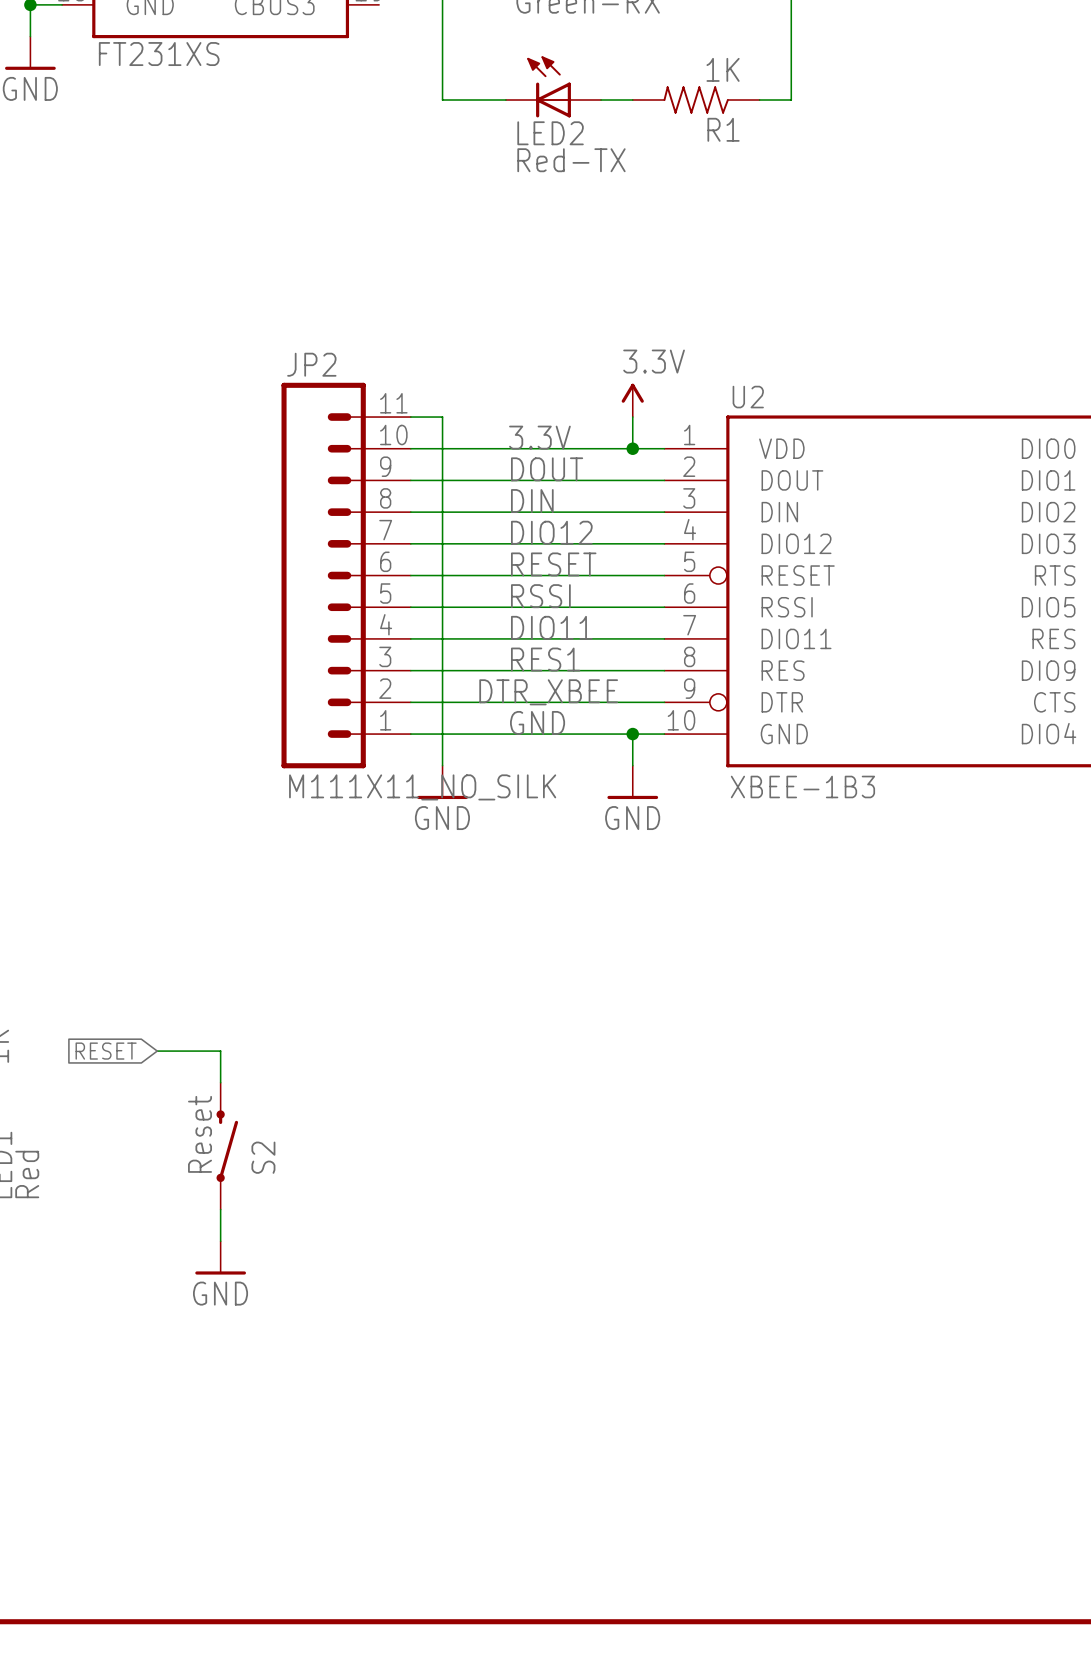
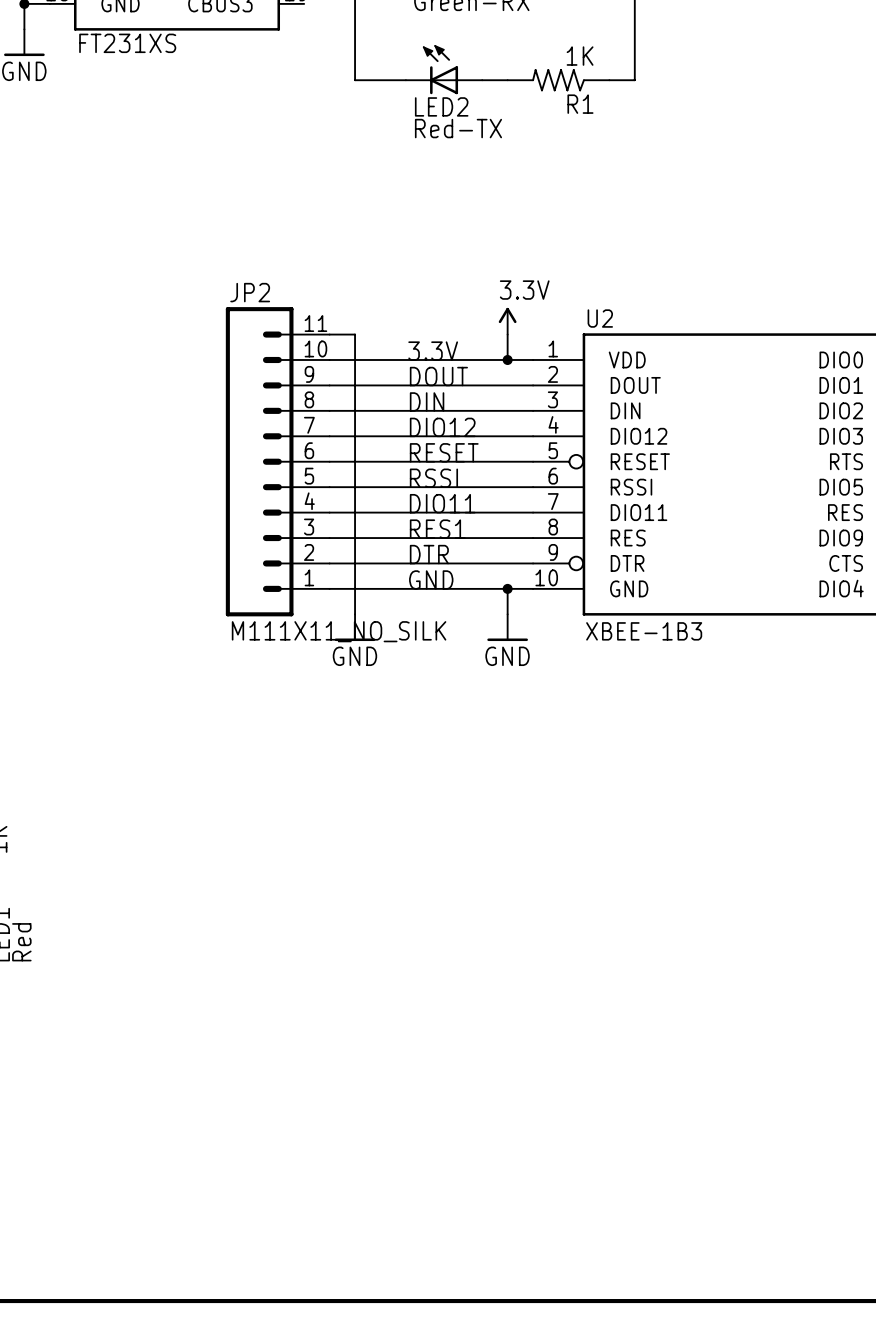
label: none -> DTR (429, 554)
label: DTR_XBEE (548, 692) -> none
global label: RESET (106, 1051) -> none
wire: (157, 1051) (220, 1051) (220, 1082) -> none
S2: Reset (227, 1146) -> none
wire: (220, 1209) (220, 1241) -> none
power symbol: GND (220, 1257) -> none

